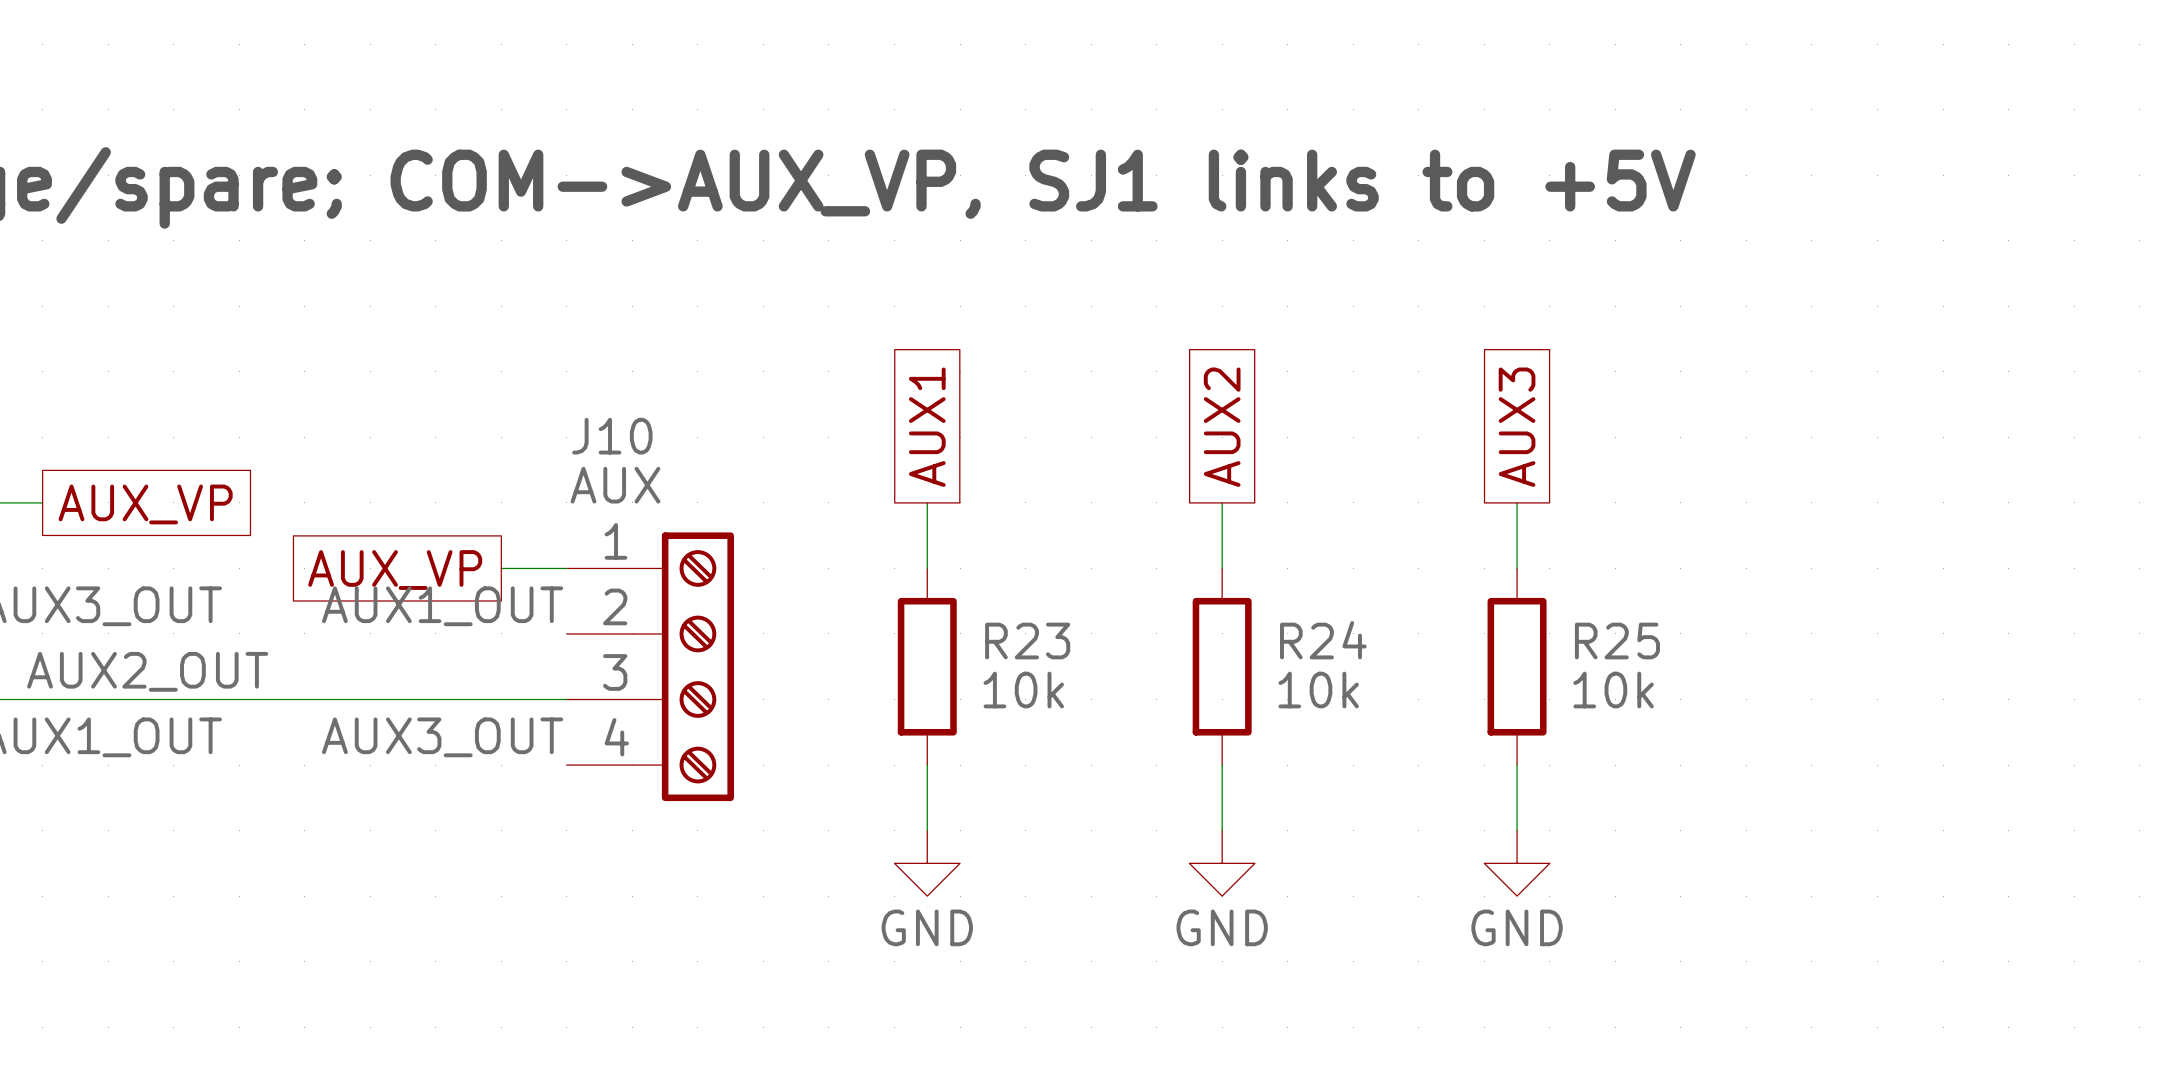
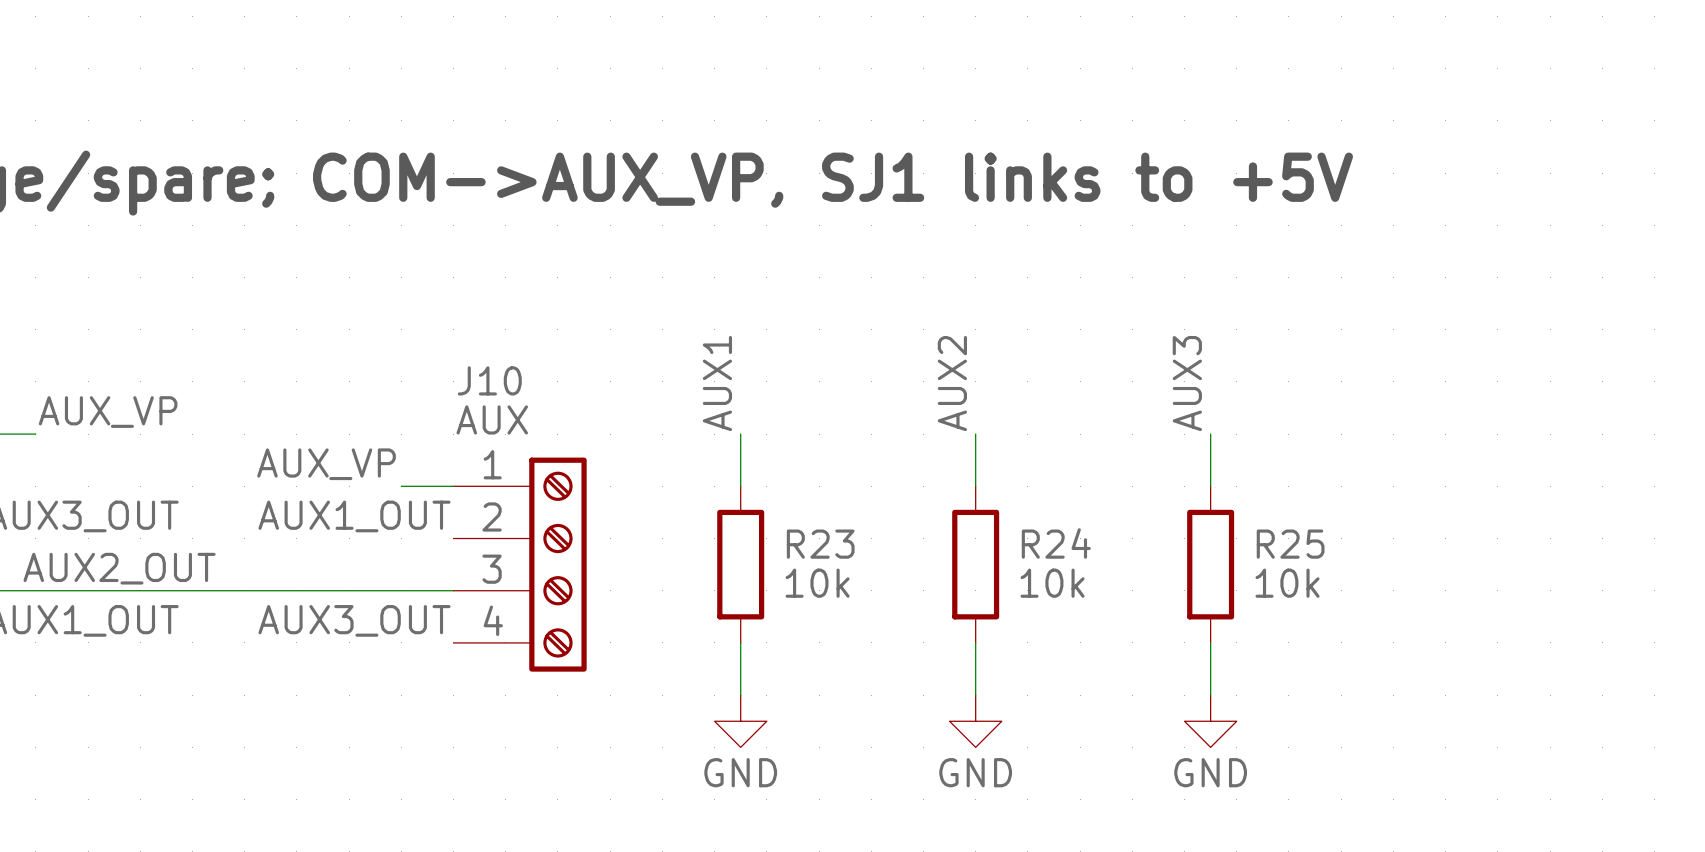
global label: AUX1 (927, 427) -> none
global label: AUX2 (1222, 427) -> none
global label: AUX3 (1517, 427) -> none
label: none -> AUX1 (717, 383)
label: none -> AUX2 (952, 383)
label: none -> AUX3 (1187, 383)
label: none -> AUX_VP (108, 412)
global label: AUX_VP (145, 504) -> none
label: none -> AUX_VP (326, 464)
global label: AUX_VP (395, 570) -> none

